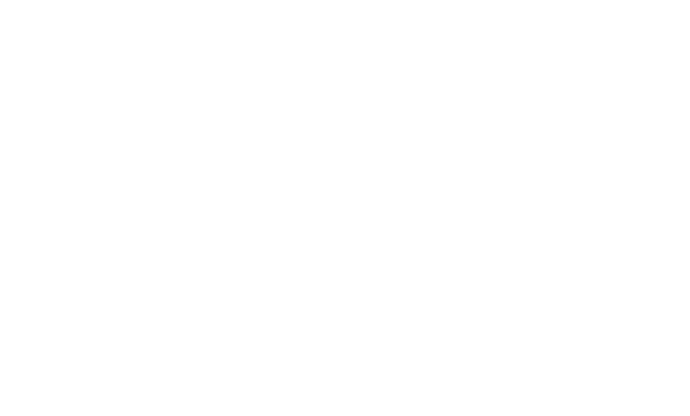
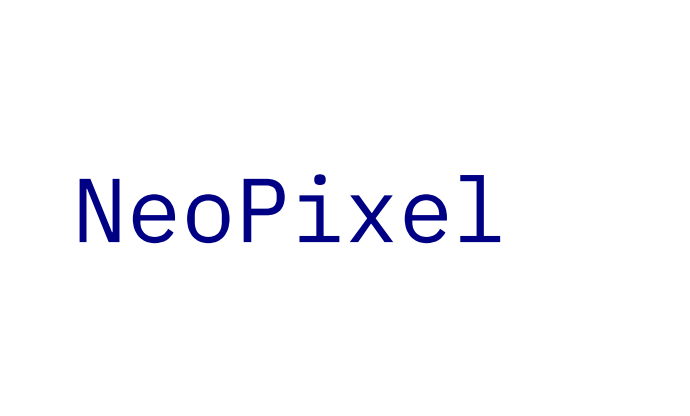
text: none -> NeoPixel (289, 208)

